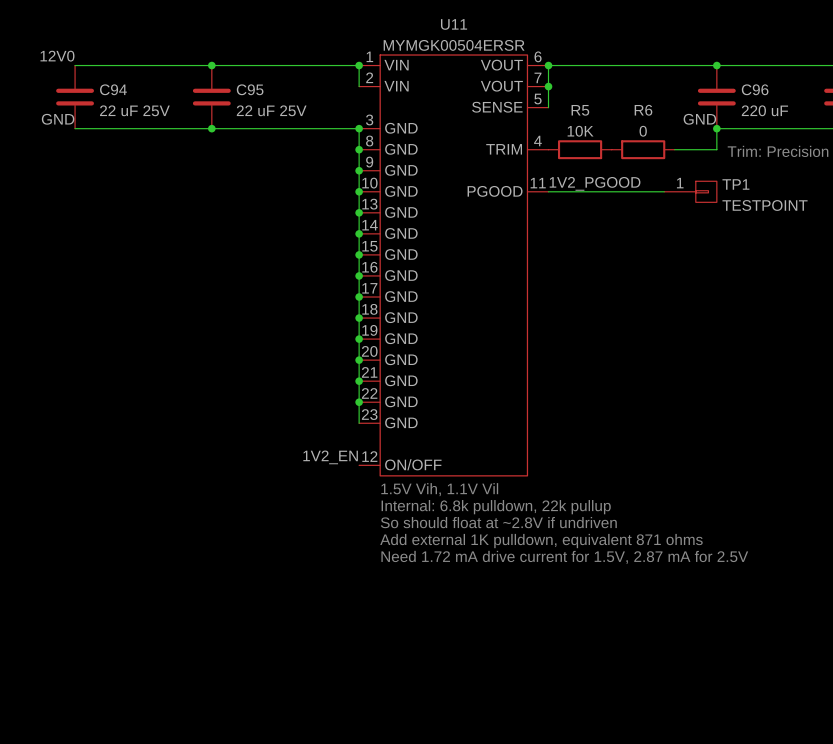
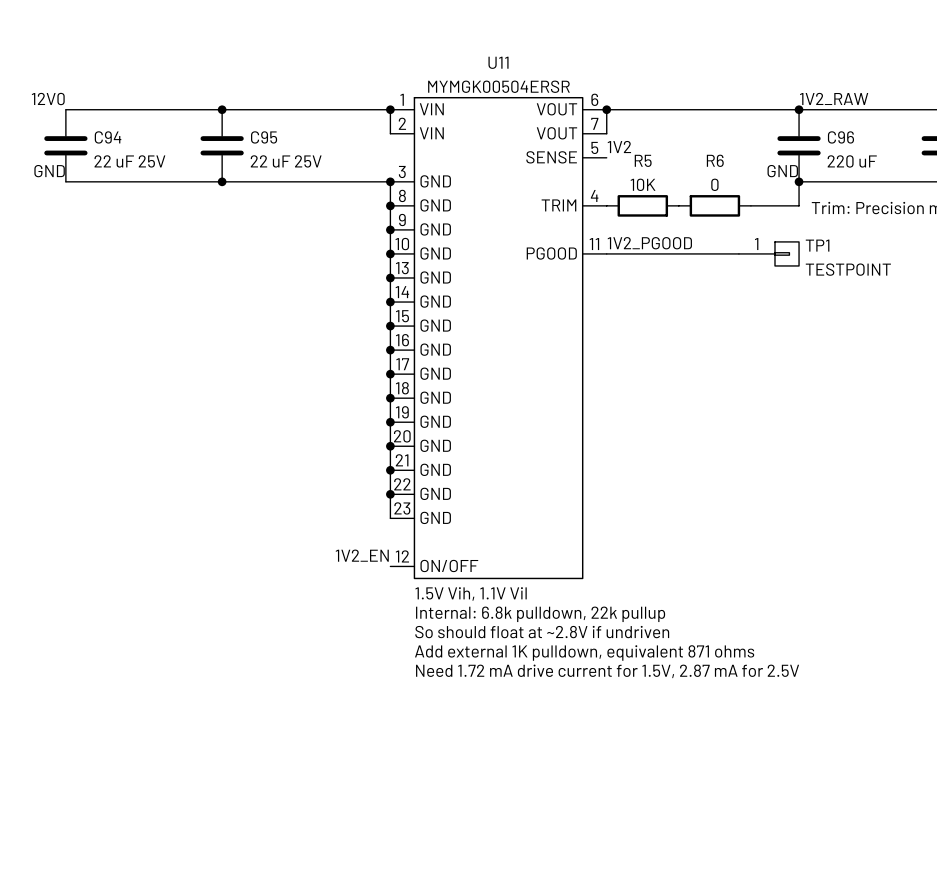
label: none -> 1V2_RAW (834, 98)
wire: (548, 86) (548, 107) -> none
junction: (548, 86) -> none
label: none -> 1V2 (619, 147)

